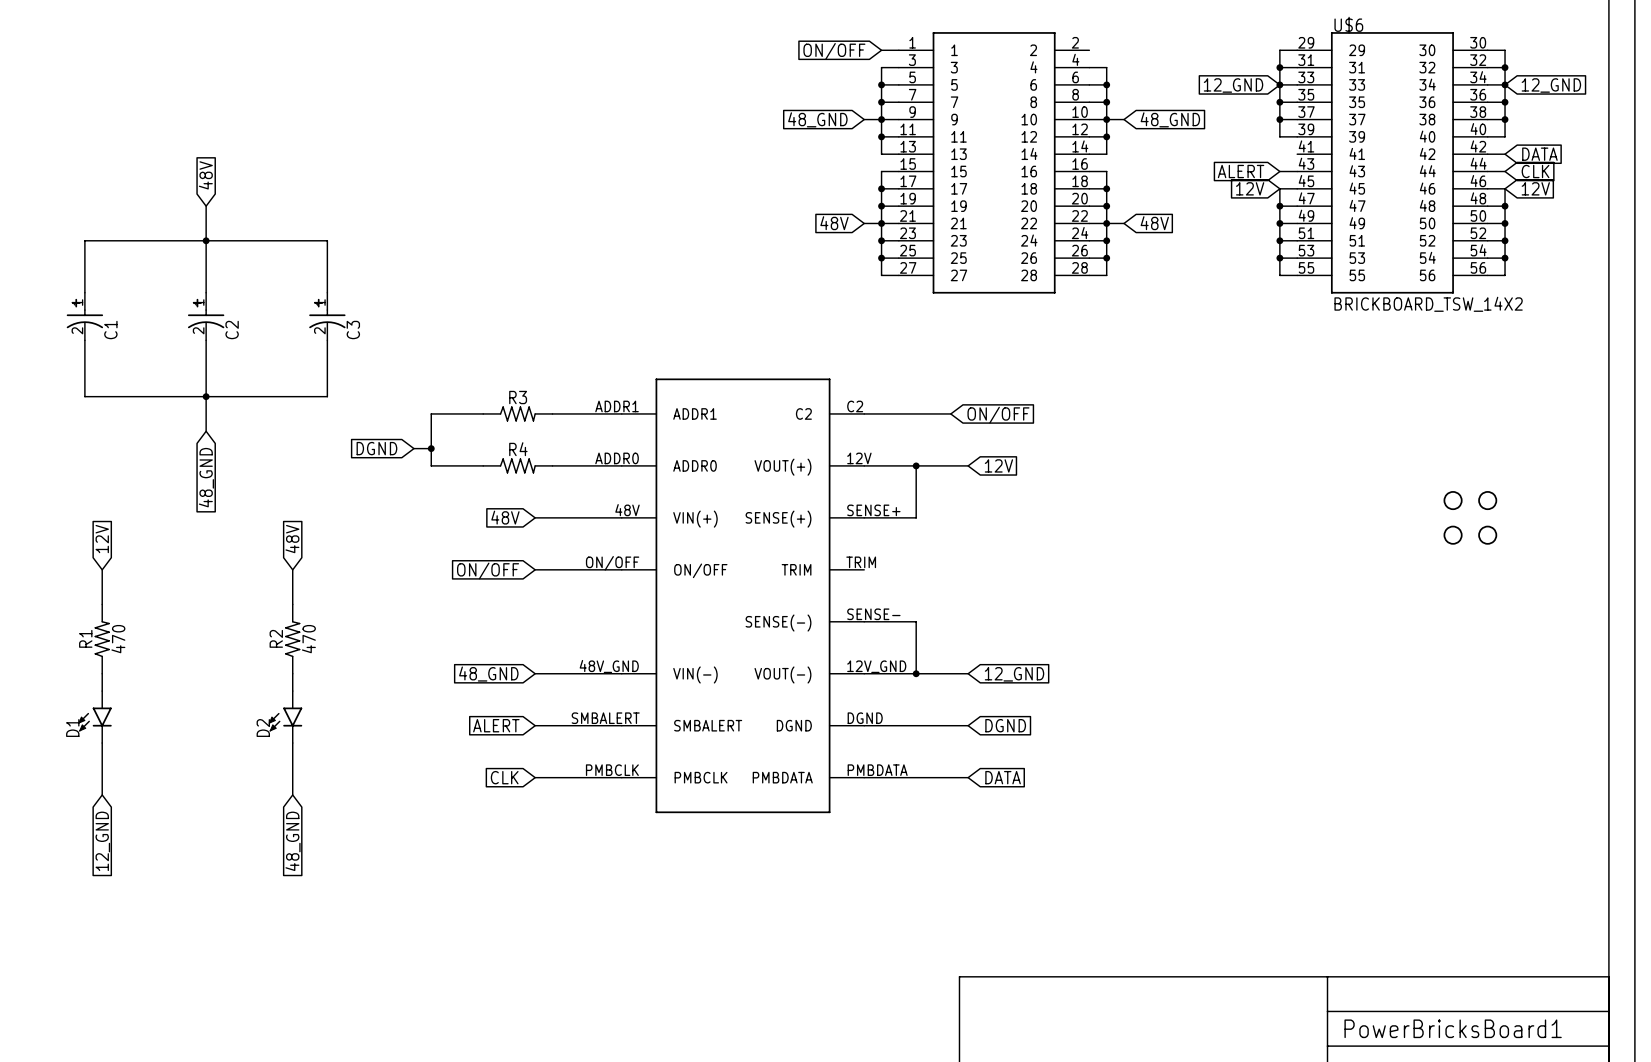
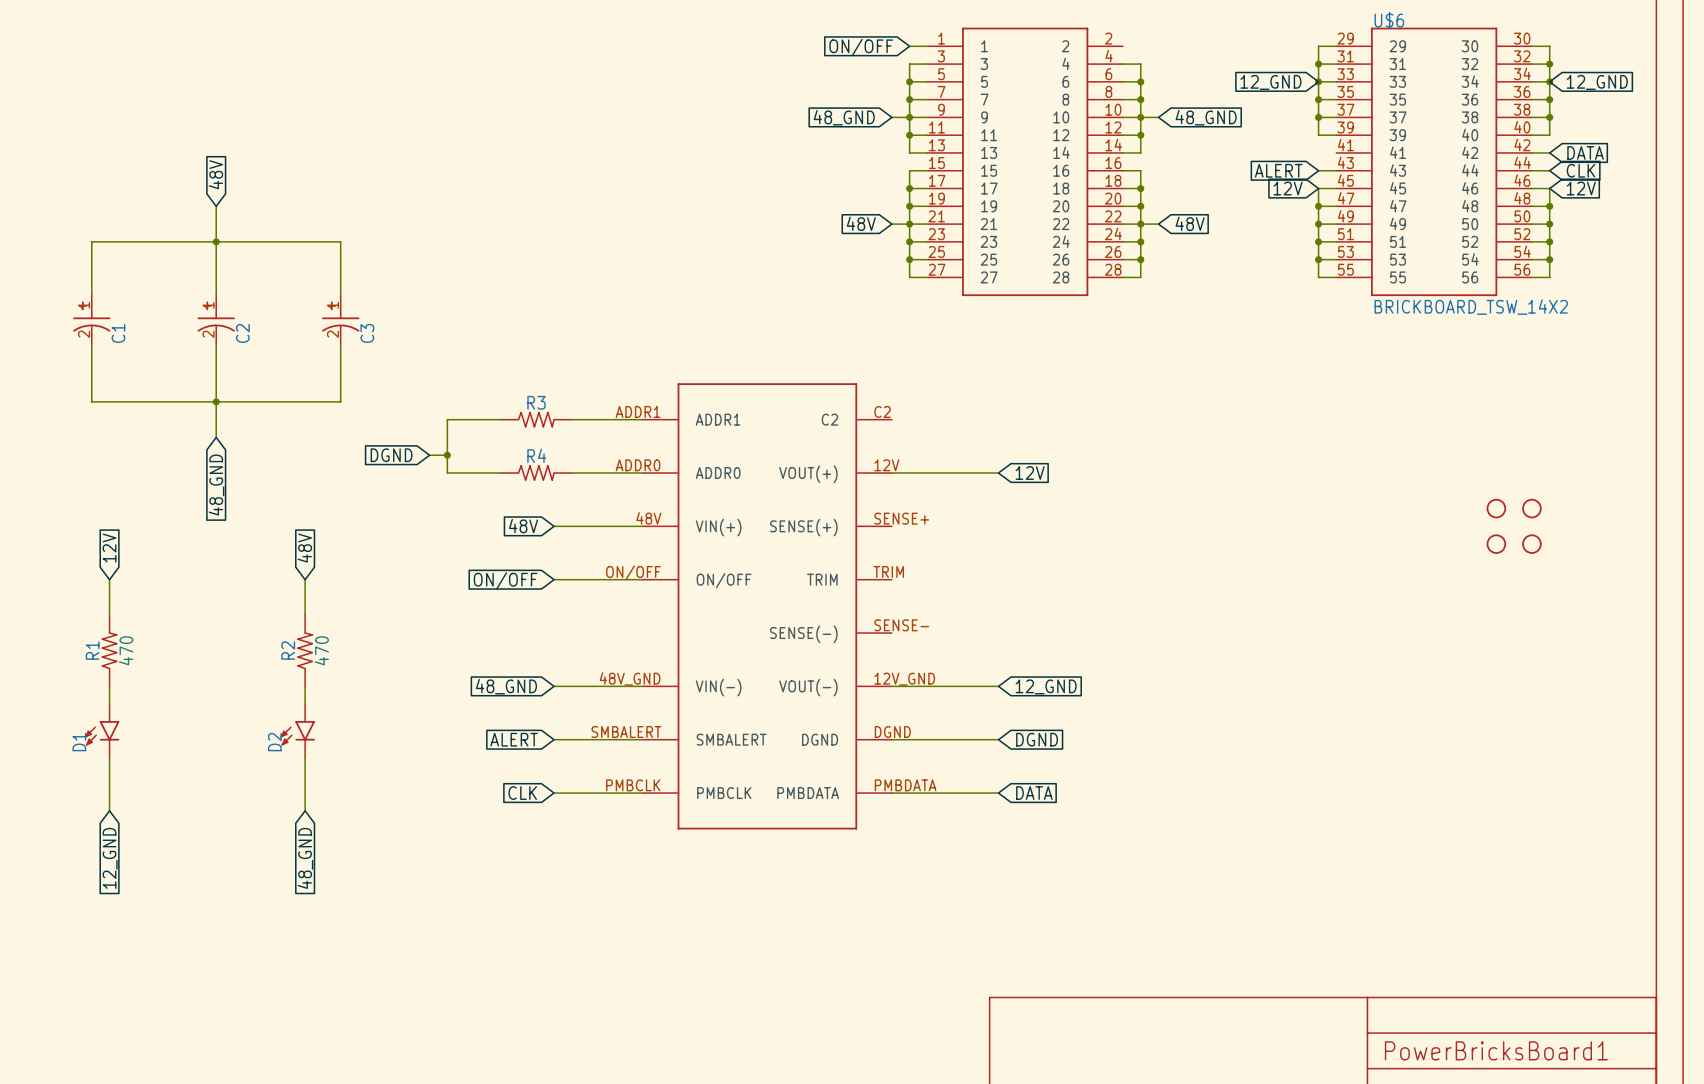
wire: (864, 413) (950, 413) -> none
global label: ON/OFF (998, 415) -> none
wire: (916, 465) (916, 517) (864, 517) -> none
junction: (916, 465) -> none
wire: (864, 621) (916, 621) (916, 673) -> none
junction: (916, 673) -> none

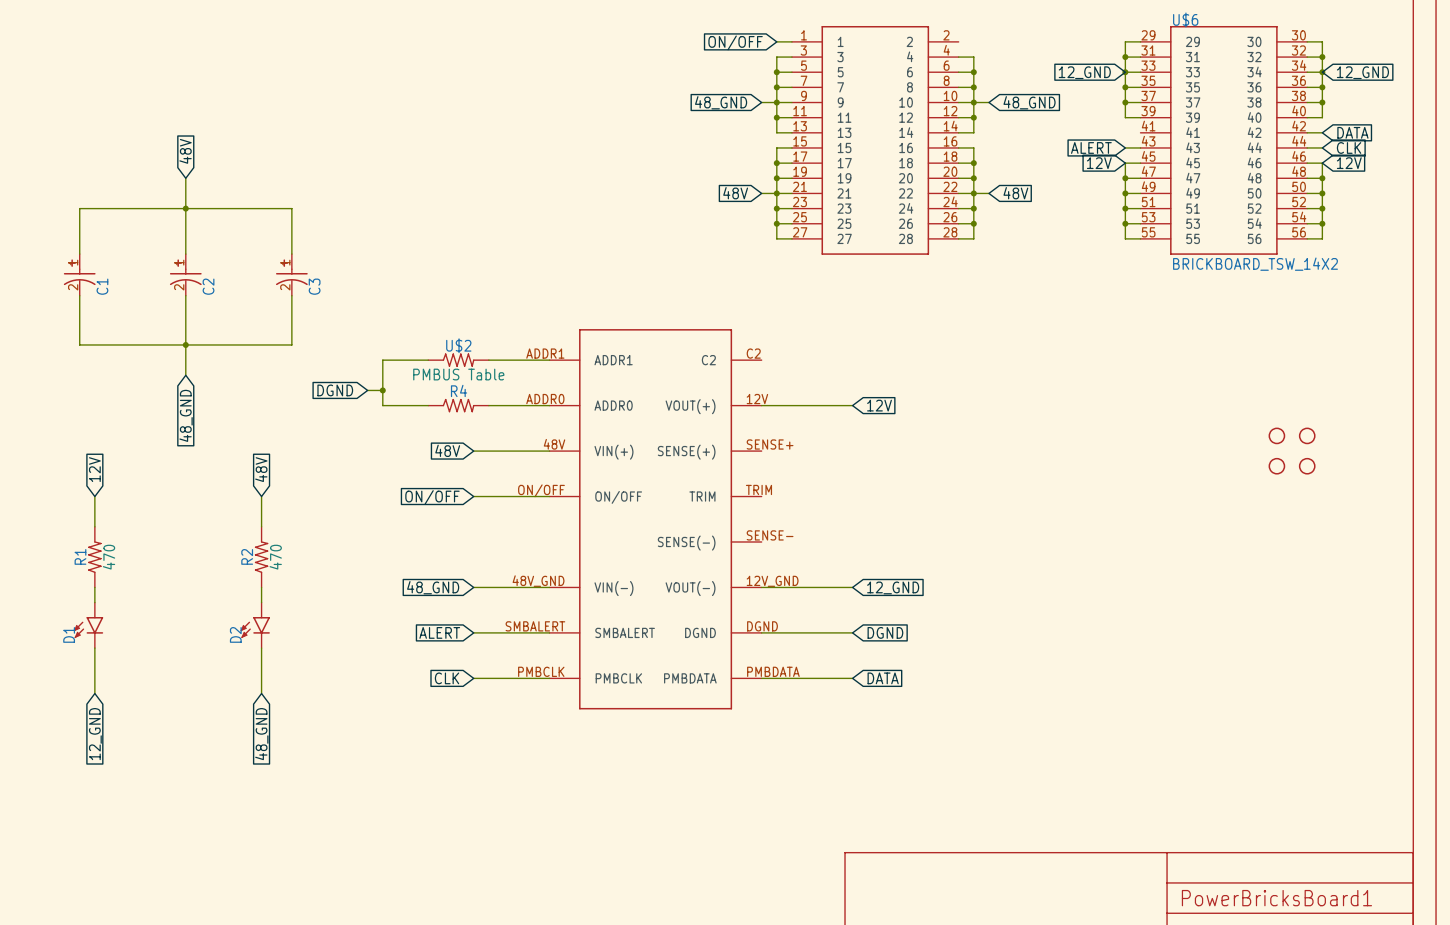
R3 name: R3 (536, 402) -> U$2 (458, 345)
R3 text: none -> PMBUS Table (458, 374)

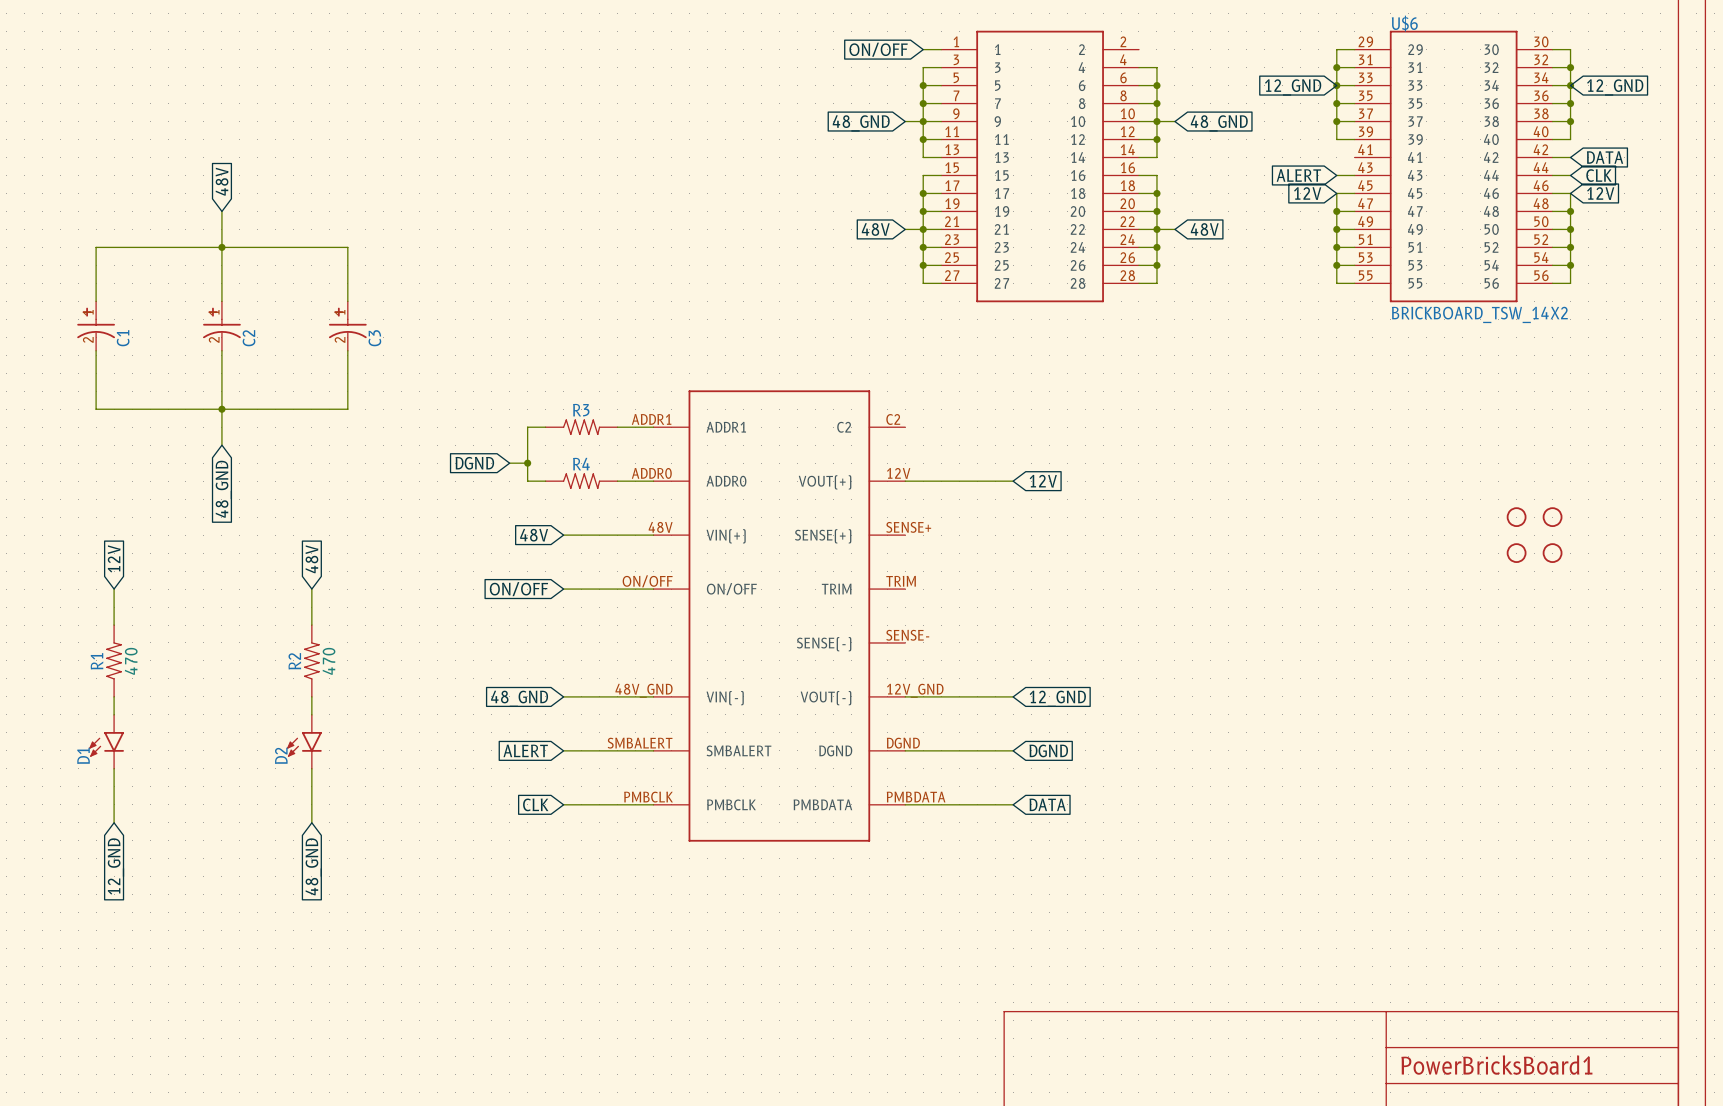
wire: (428, 360) (382, 360) (382, 405) (428, 405) -> none
wire: none -> (545, 427) (527, 427) (527, 481) (545, 481)
U$2: (458, 360) -> none
R3: none -> (581, 427)
global label position: DGND (335, 390) -> DGND (474, 463)
wire: (367, 390) (382, 390) -> (509, 463) (527, 463)
junction: (382, 390) -> none
junction: none -> (527, 463)
R4 position: (458, 405) -> (581, 481)

